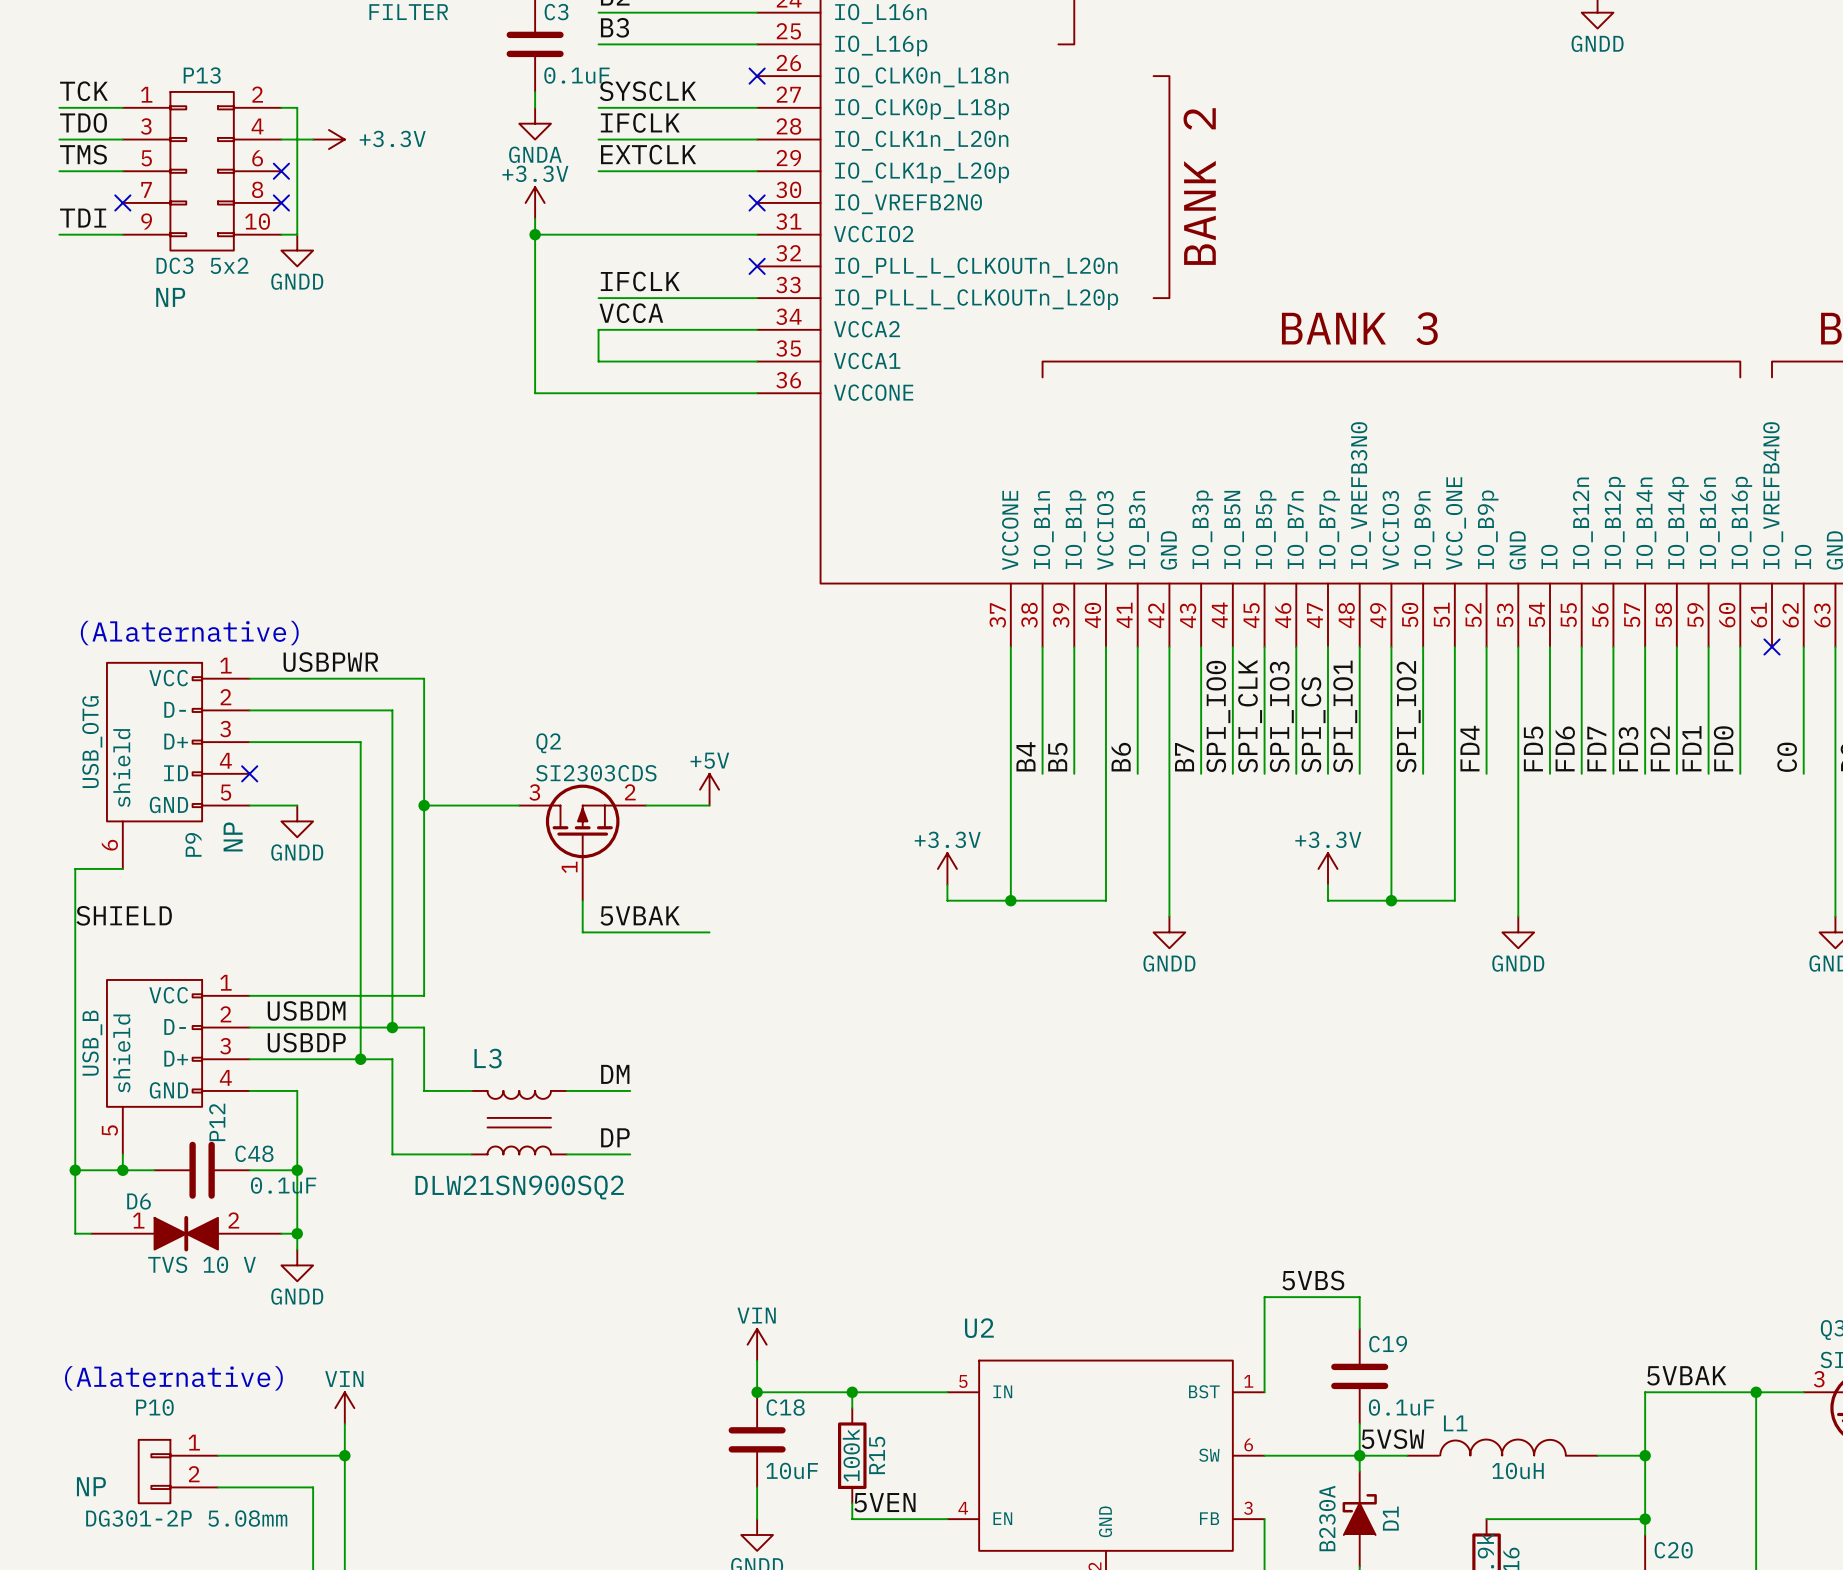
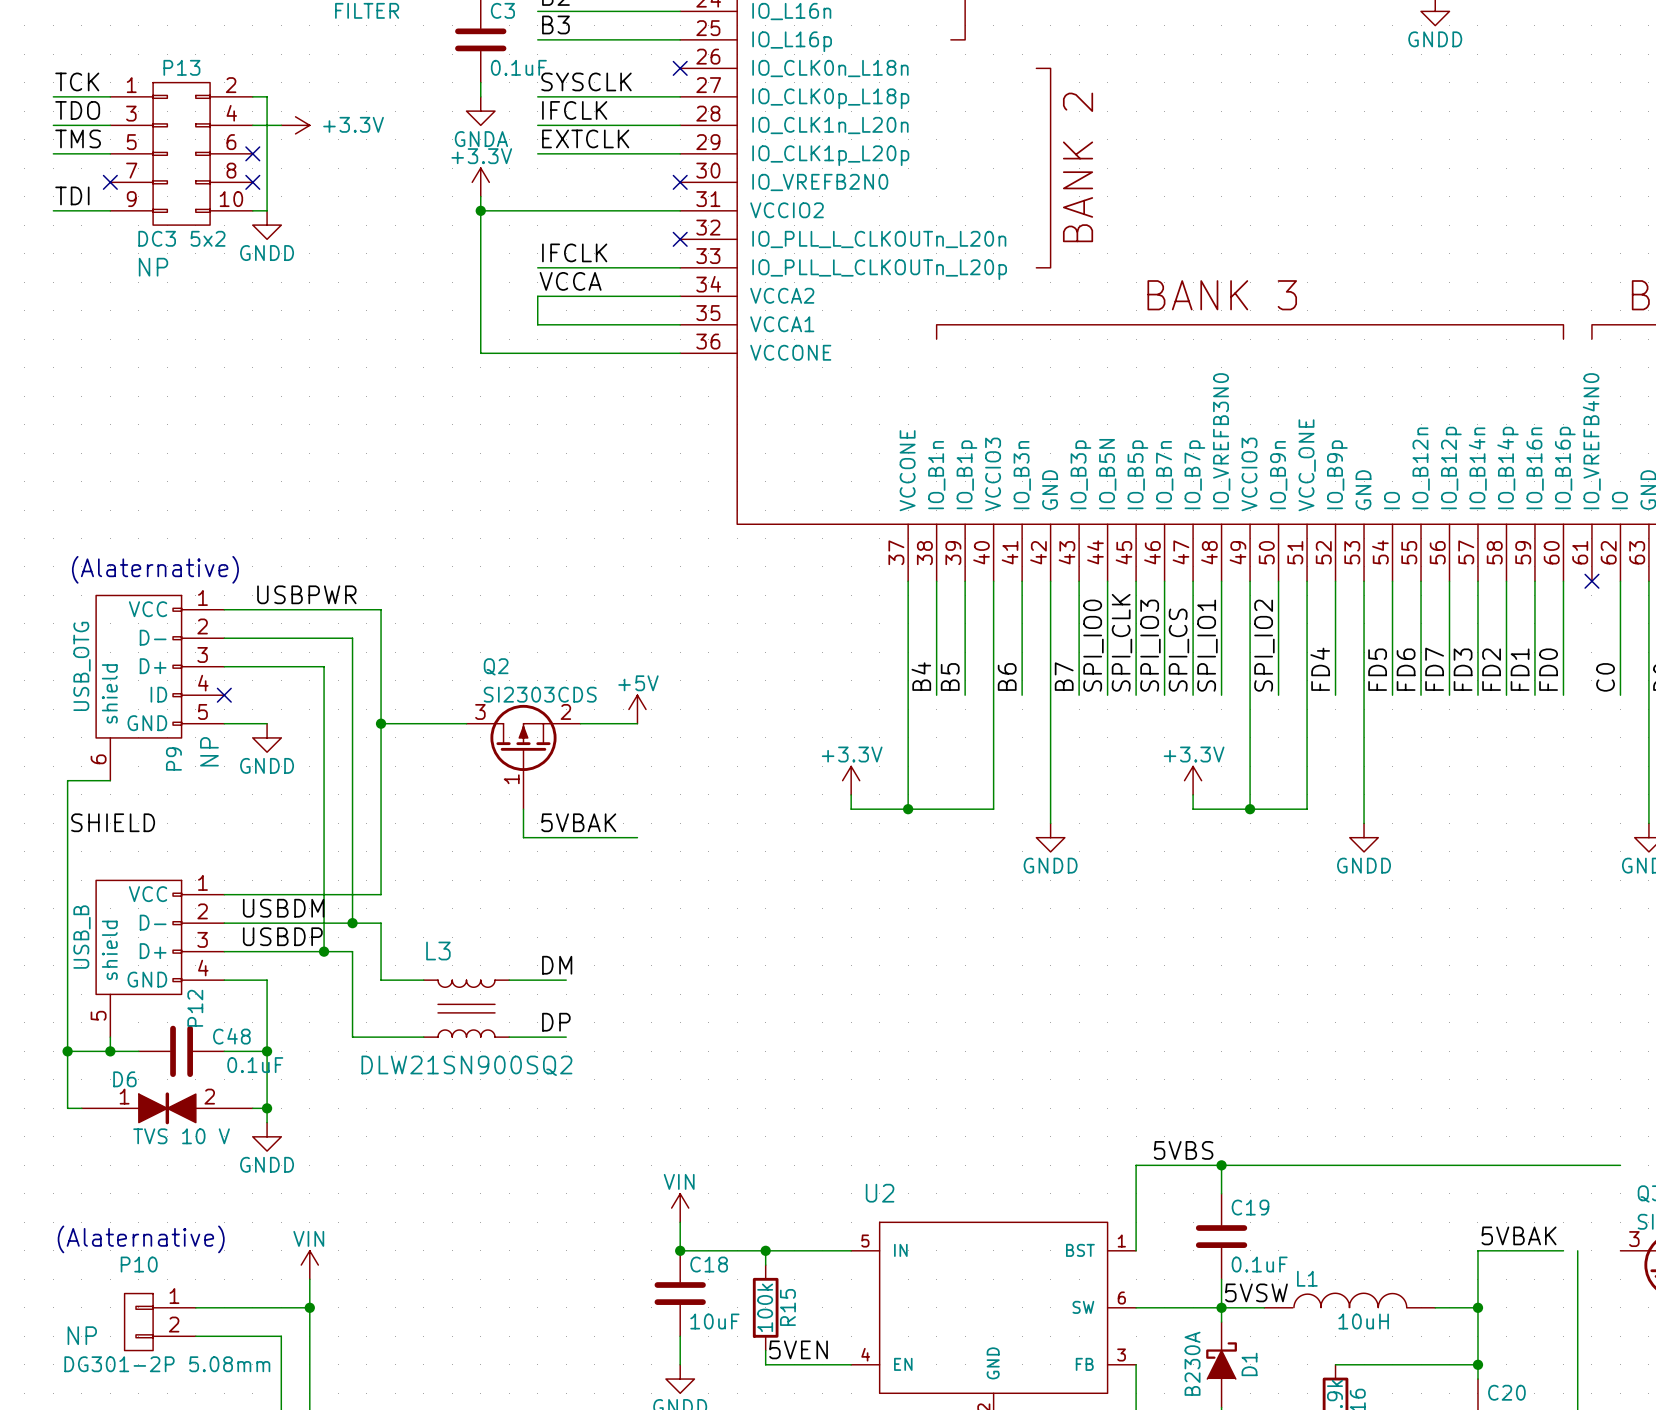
wire: none -> (1221, 1165) (1620, 1165)
junction: none -> (1221, 1165)
wire: (1740, 1392) (1803, 1392) -> none
junction: (1756, 1392) -> none

